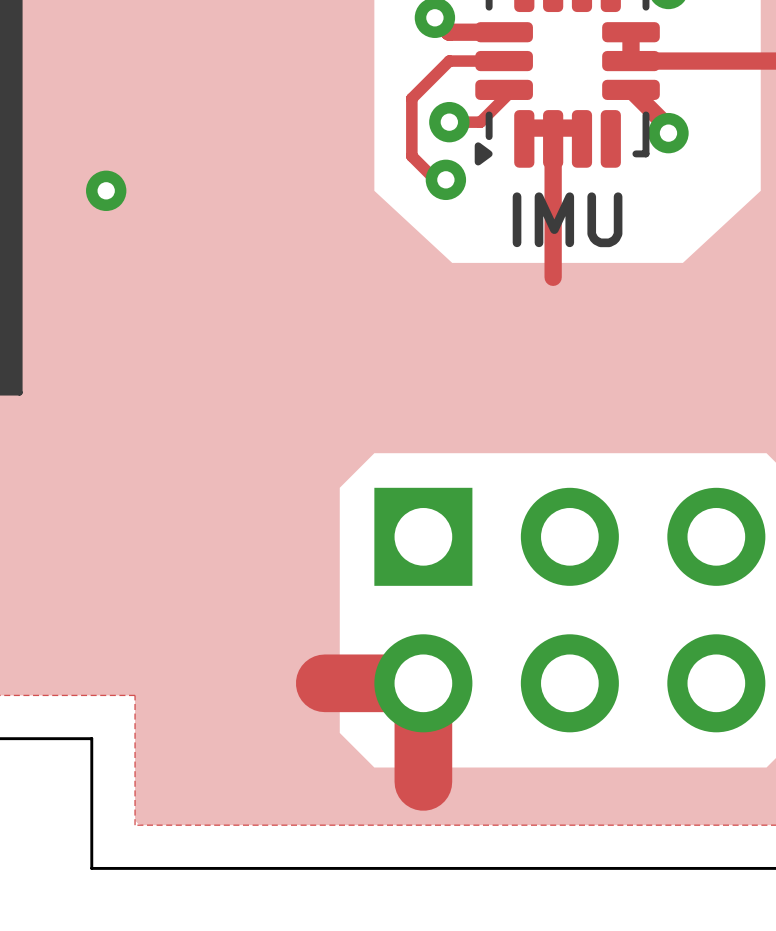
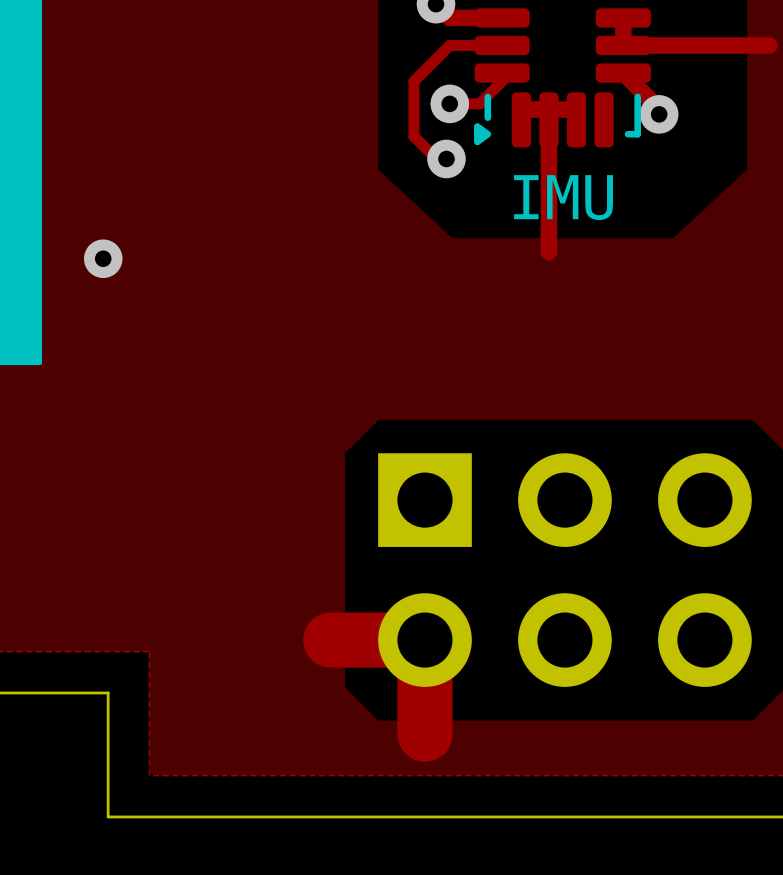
via position: (106, 190) -> (103, 258)

